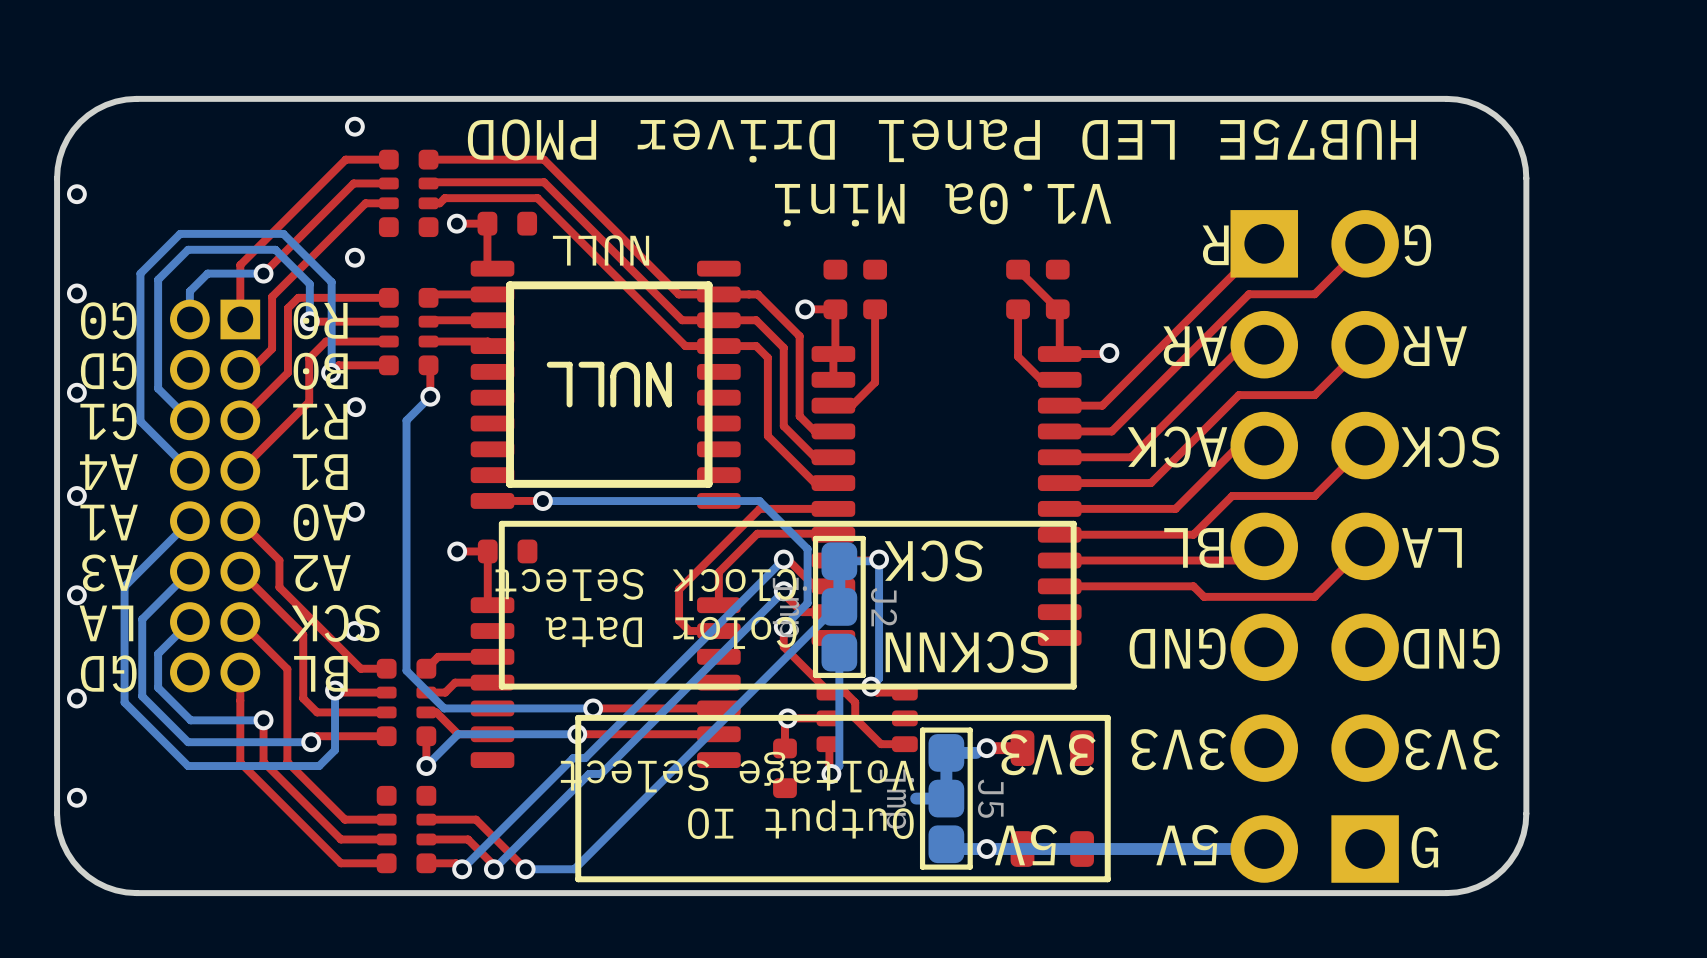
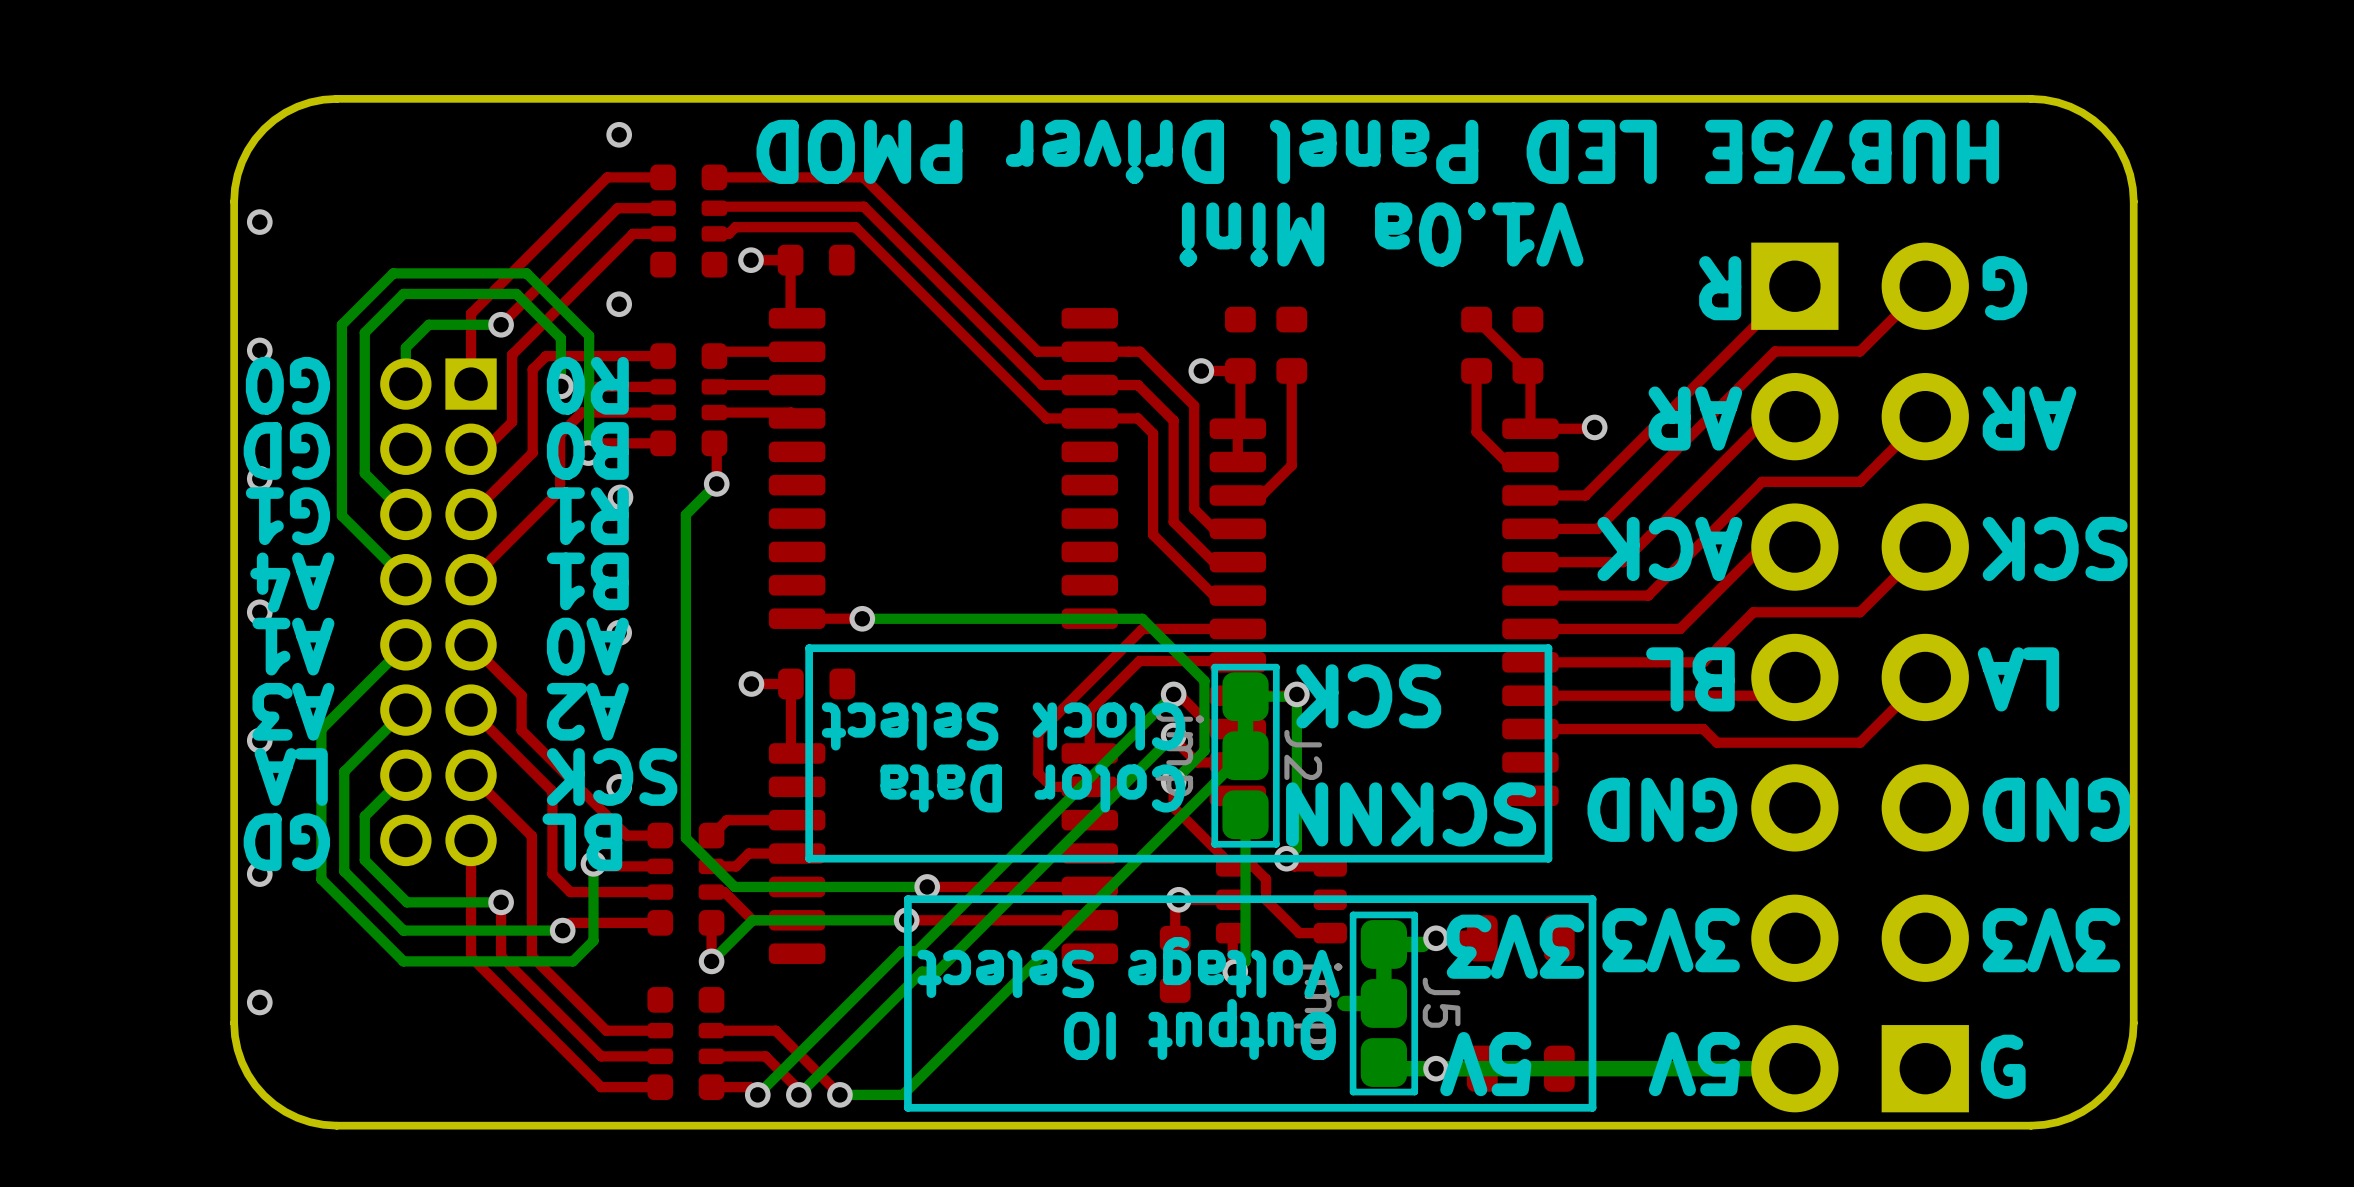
text: NULL (601, 250) -> none
drawing: [506, 281, 713, 488] -> none

